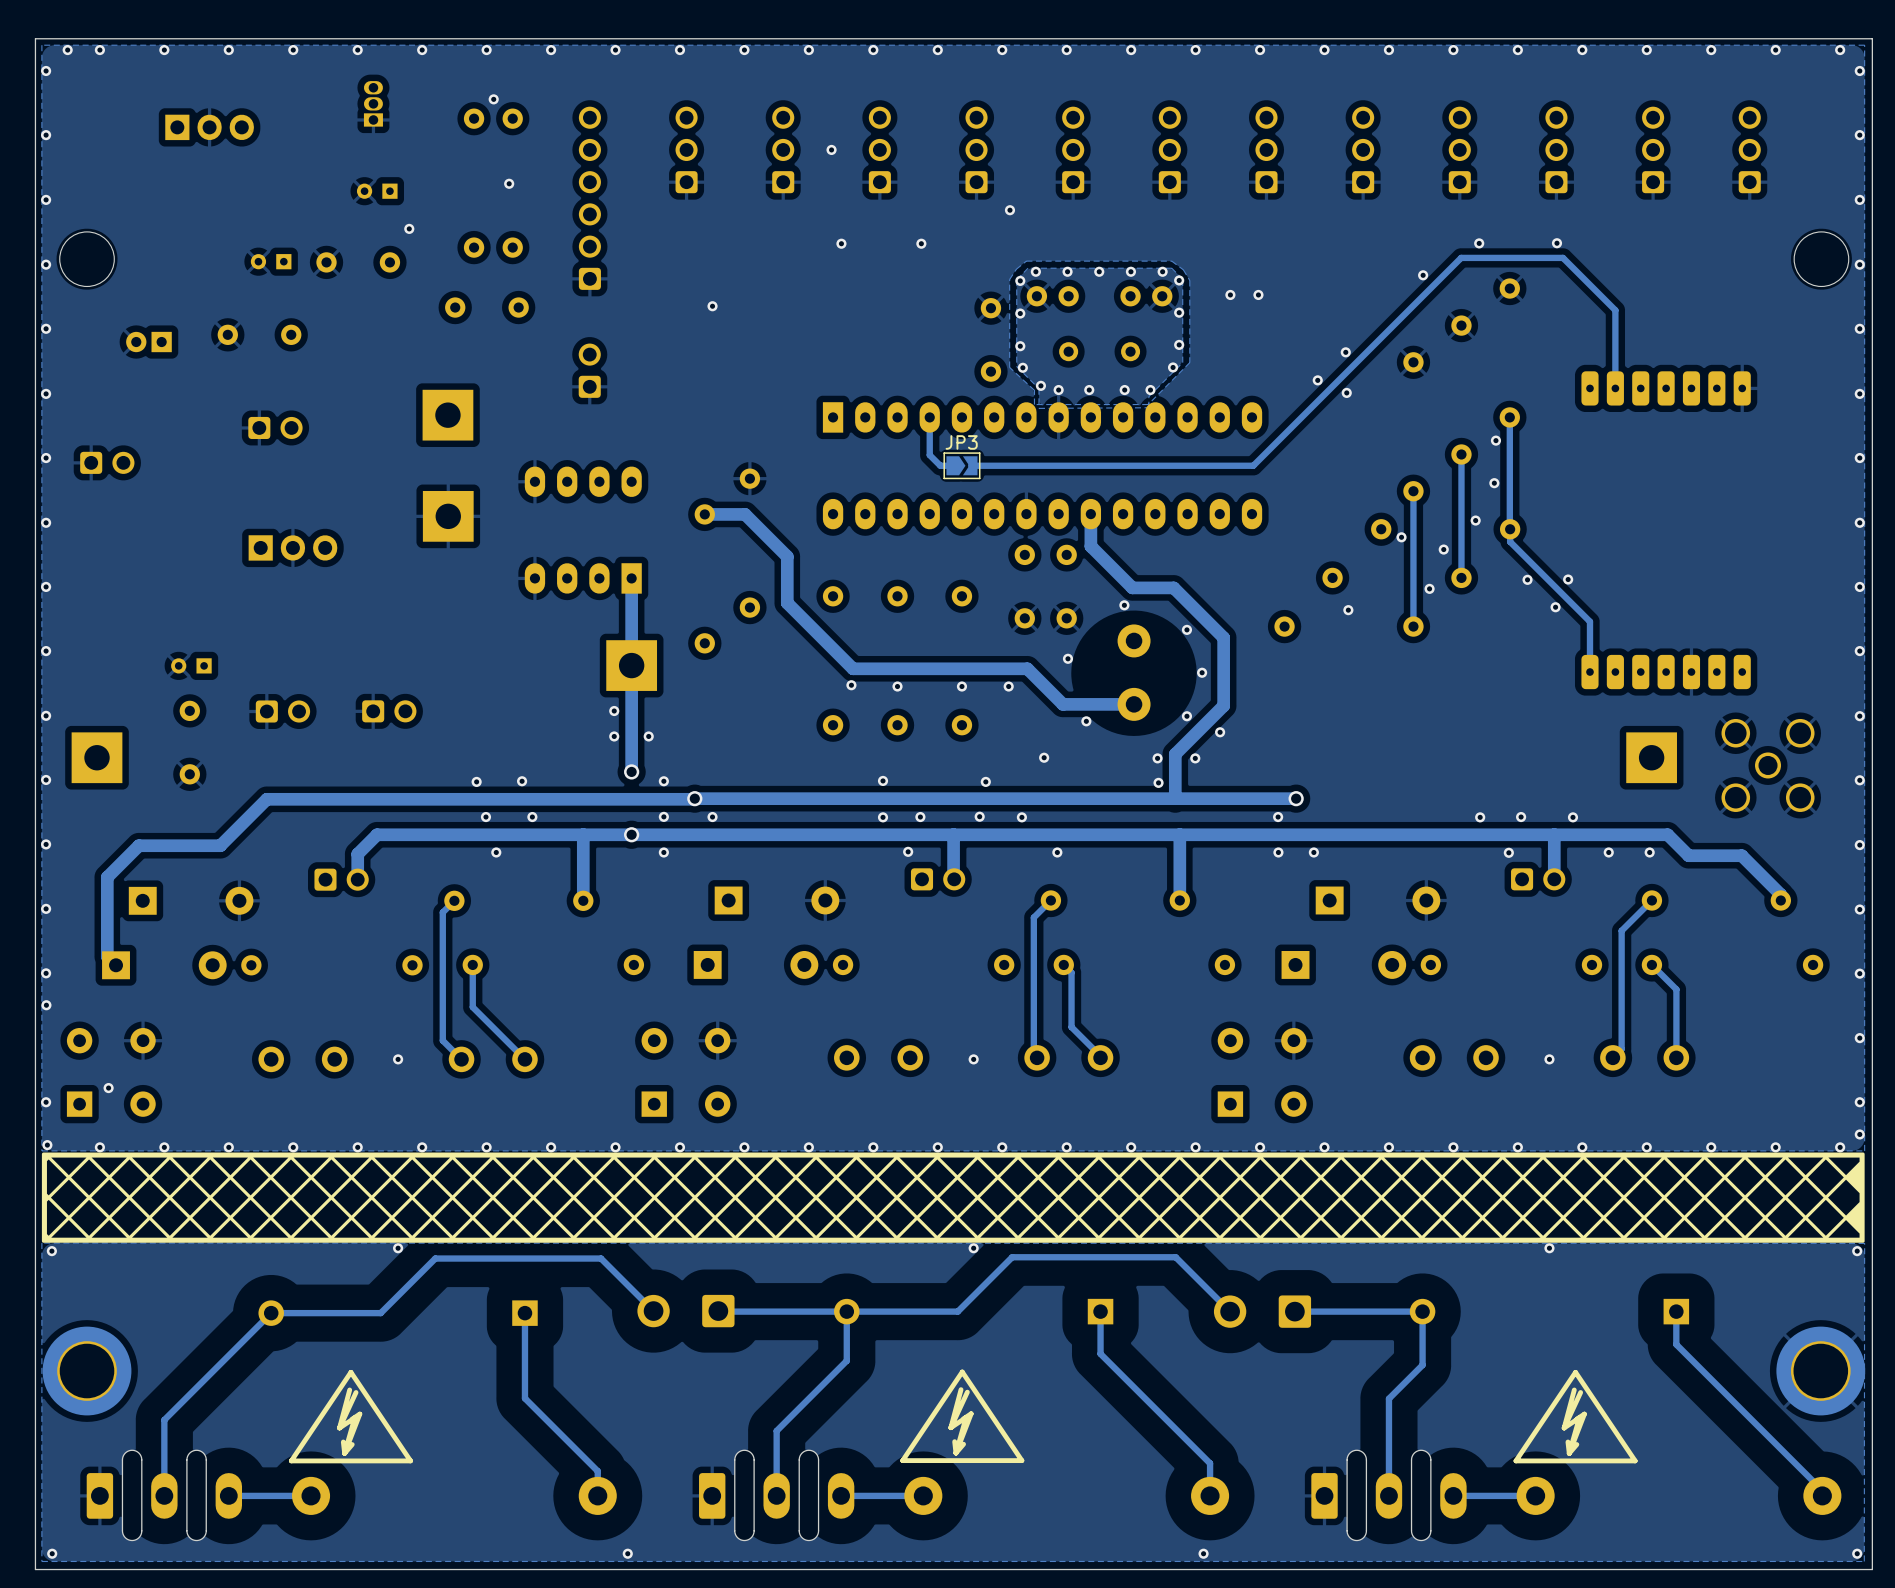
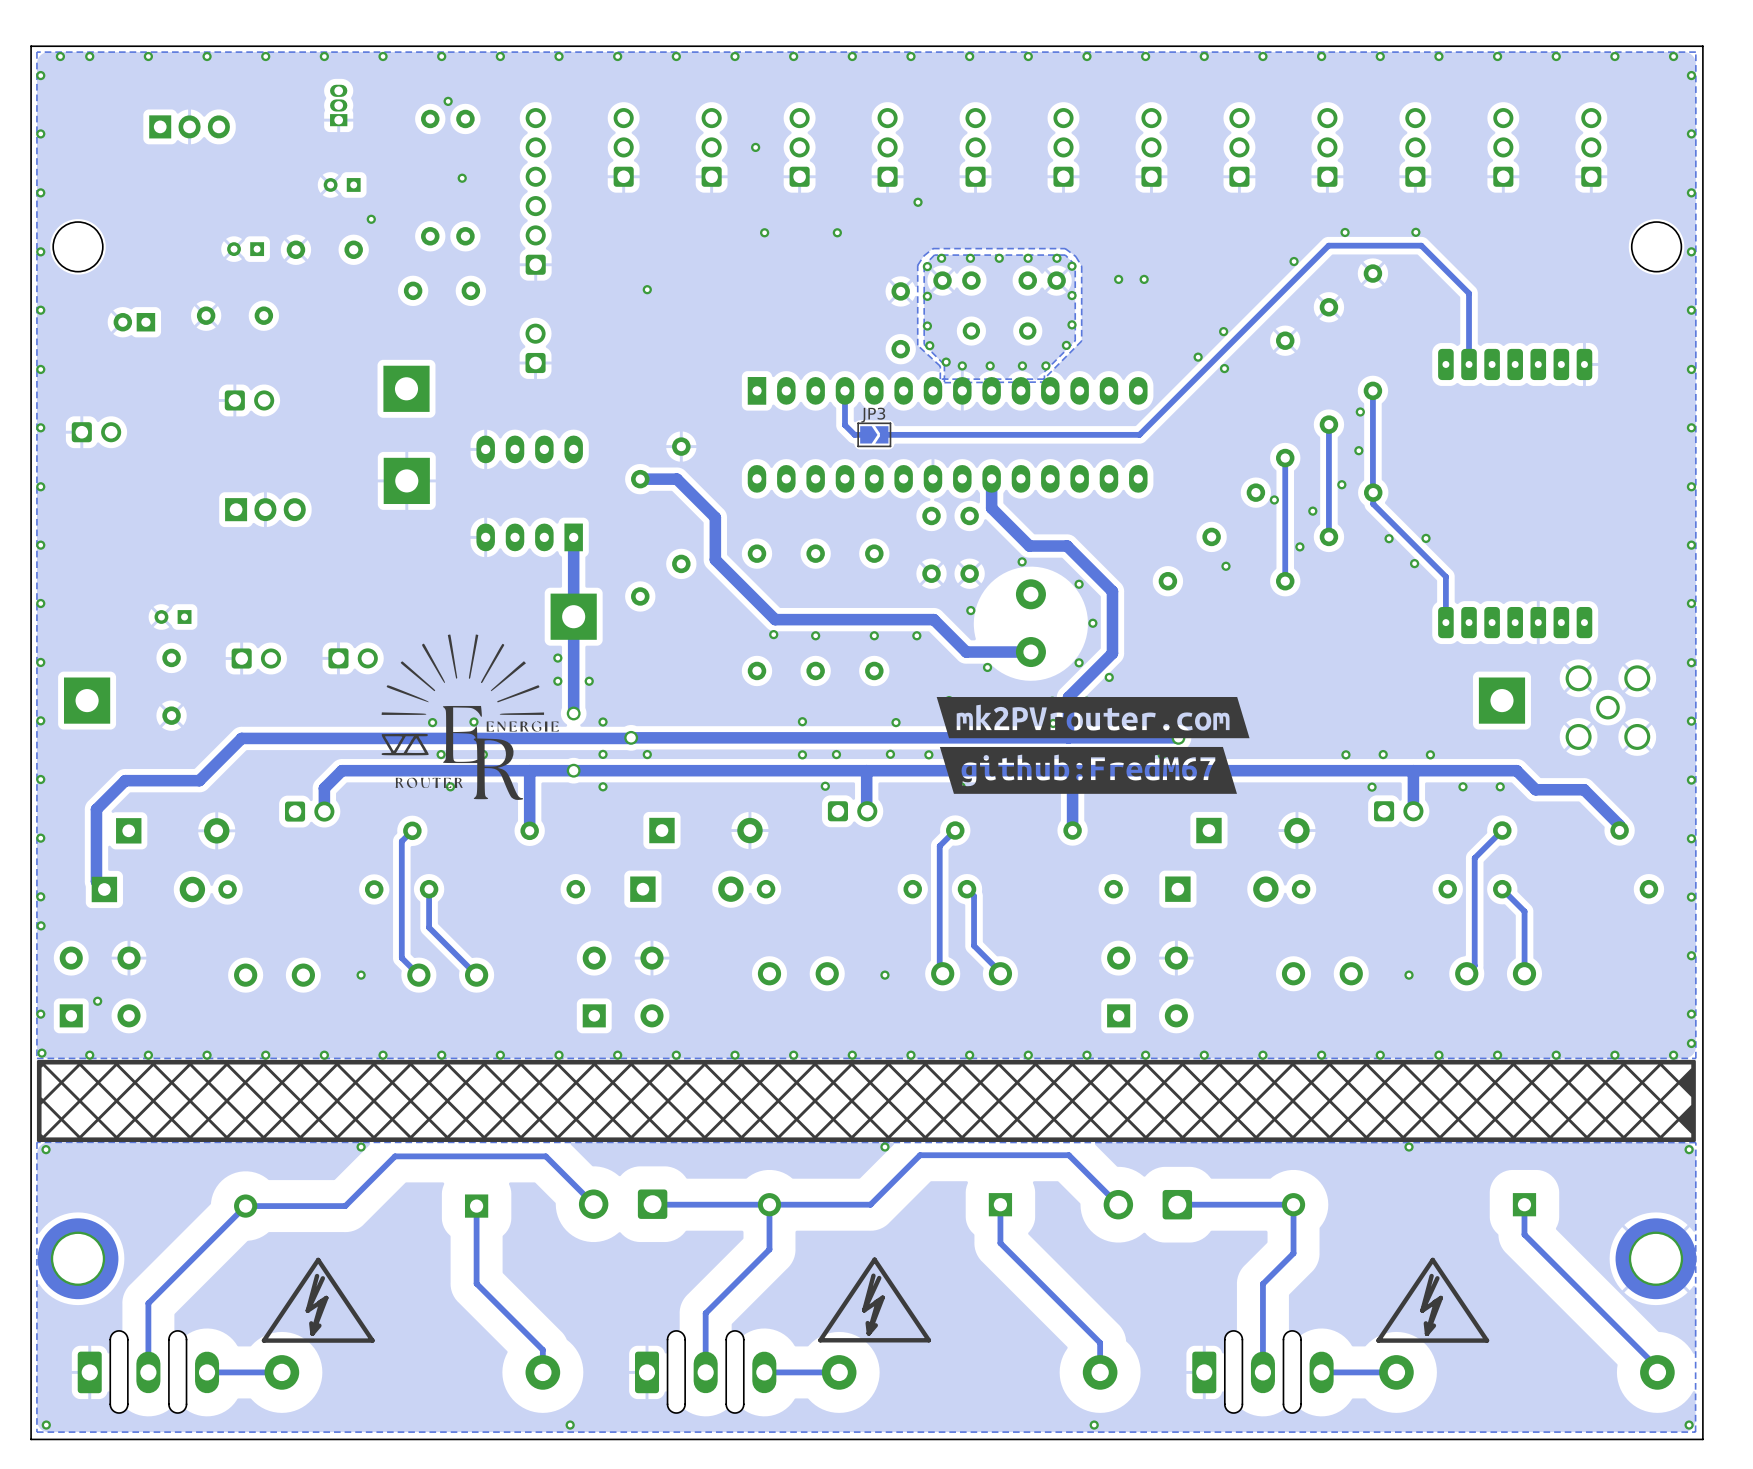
drawing: none -> [381, 634, 559, 800]
drawing: none -> [936, 697, 1250, 794]

